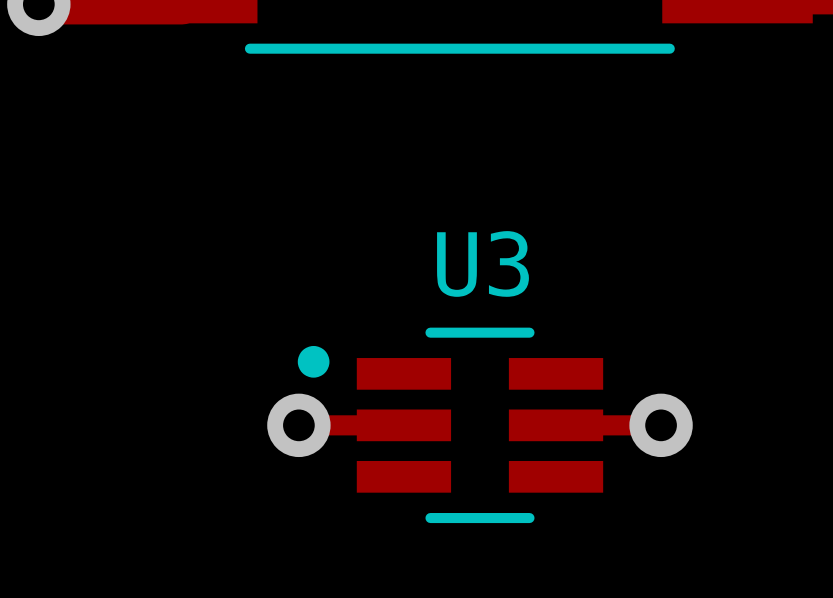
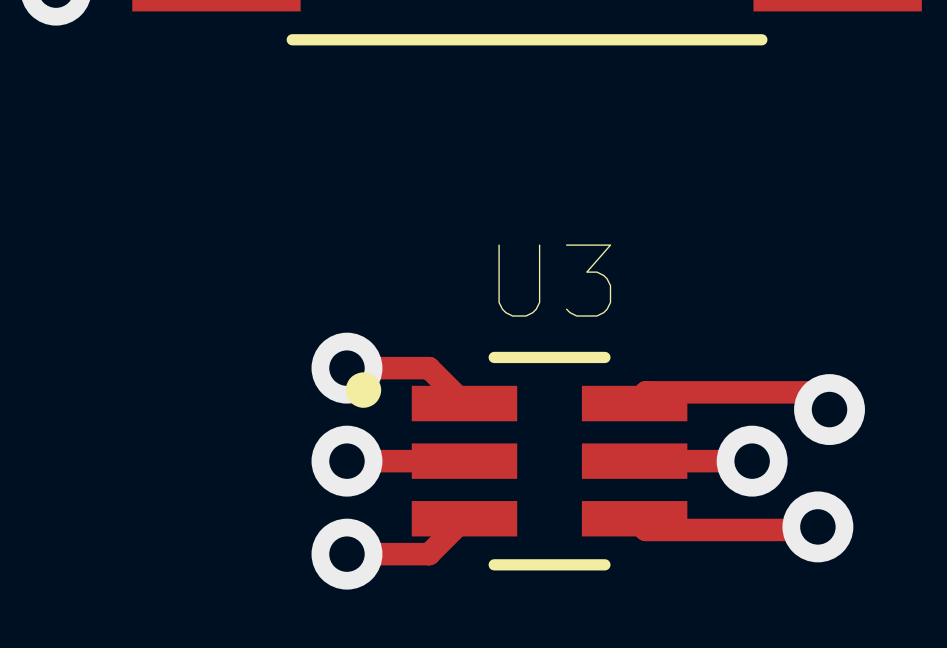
track: none -> (346, 368) (429, 368) (464, 403)
via: none -> (346, 368)
track: none -> (634, 403) (645, 392) (812, 392) (829, 409)
via: none -> (829, 409)
track: none -> (464, 518) (429, 554) (346, 554)
track: none -> (634, 518) (645, 529) (814, 529) (817, 526)
via: none -> (817, 526)
via: none -> (346, 554)

